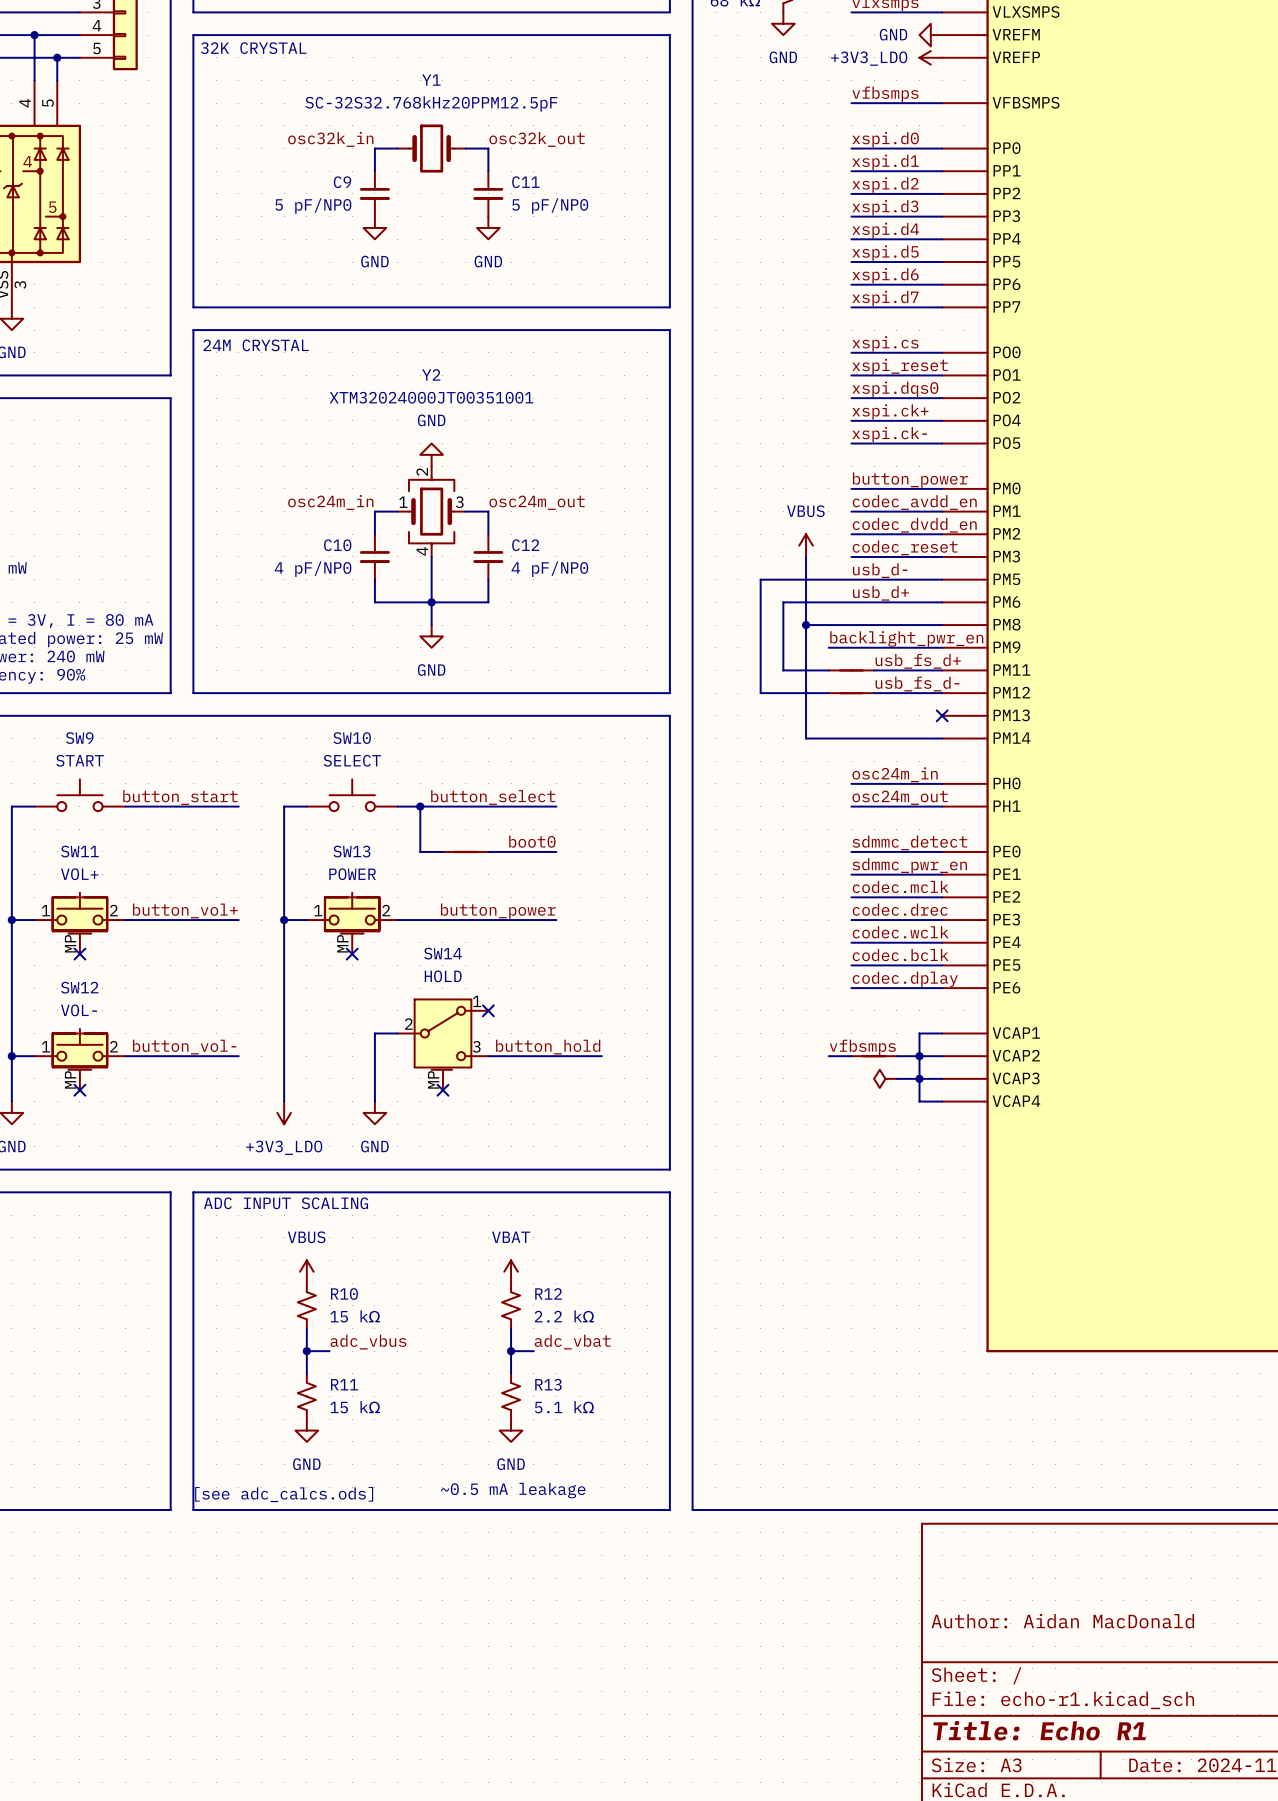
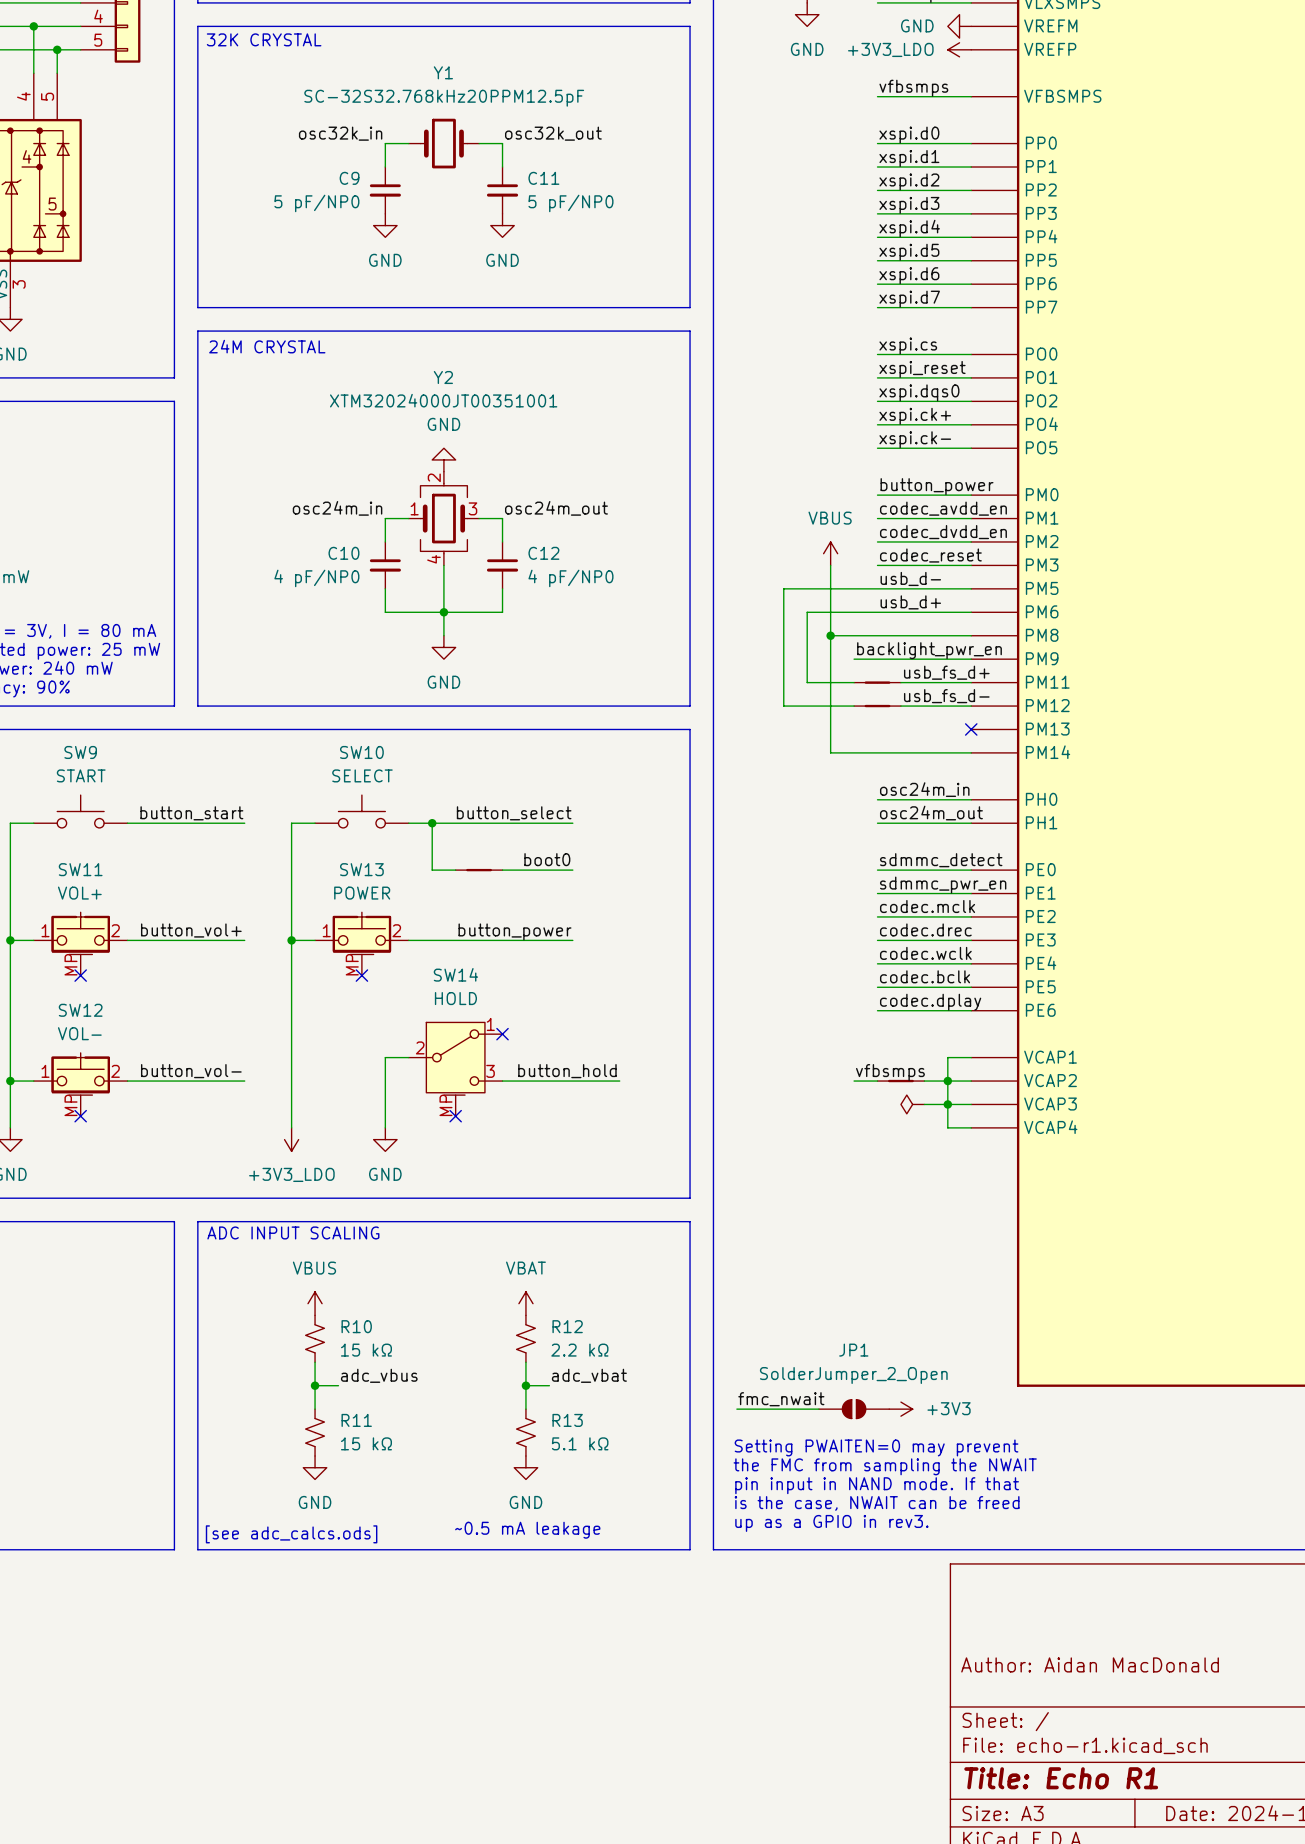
label: none -> fmc_nwait (781, 1399)
wire: none -> (736, 1409) (818, 1409)
JP1: none -> SolderJumper_2_Open (854, 1409)
power symbol: none -> +3V3 (900, 1409)
text: none -> Setting PWAITEN=0 may prevent (876, 1447)
text: none -> the FMC from sampling the NWAIT (885, 1466)
text: none -> pin input in NAND mode. If that (877, 1485)
text: none -> is the case, NWAIT can be freed (877, 1503)
text: none -> up as a GPIO in rev3. (831, 1523)

